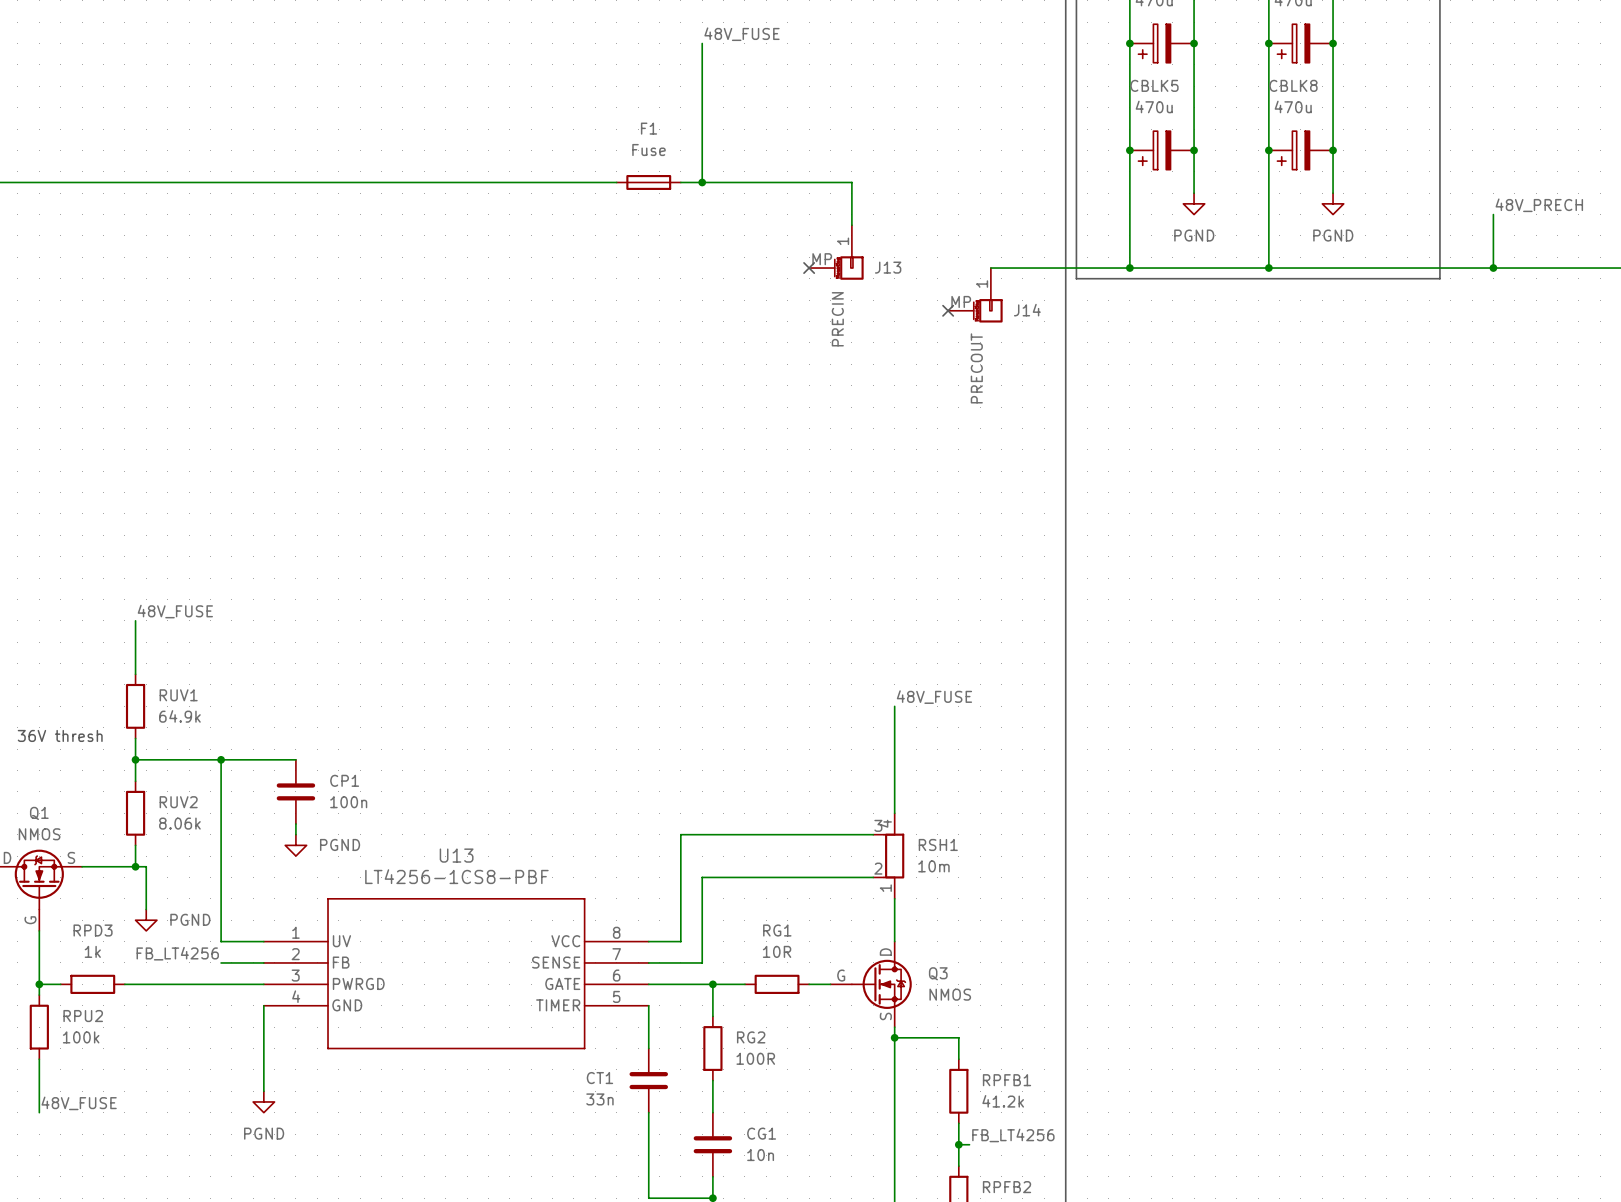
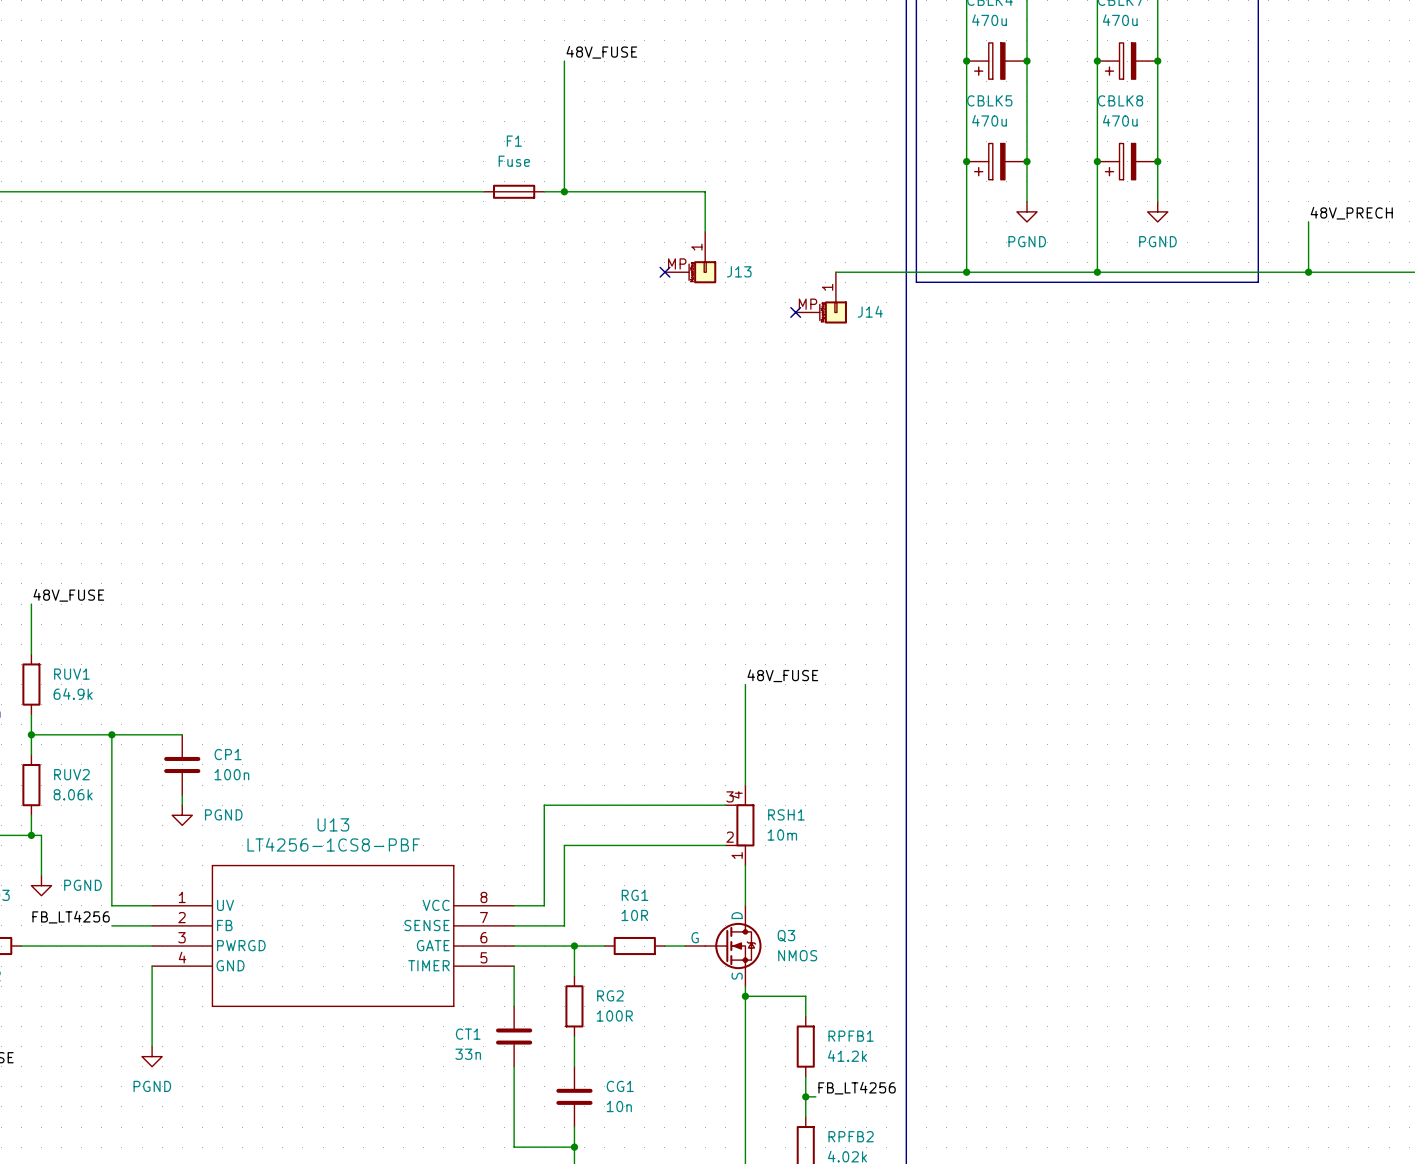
J13 value: PRECIN (837, 319) -> none
J14 value: PRECOUT (976, 368) -> none

